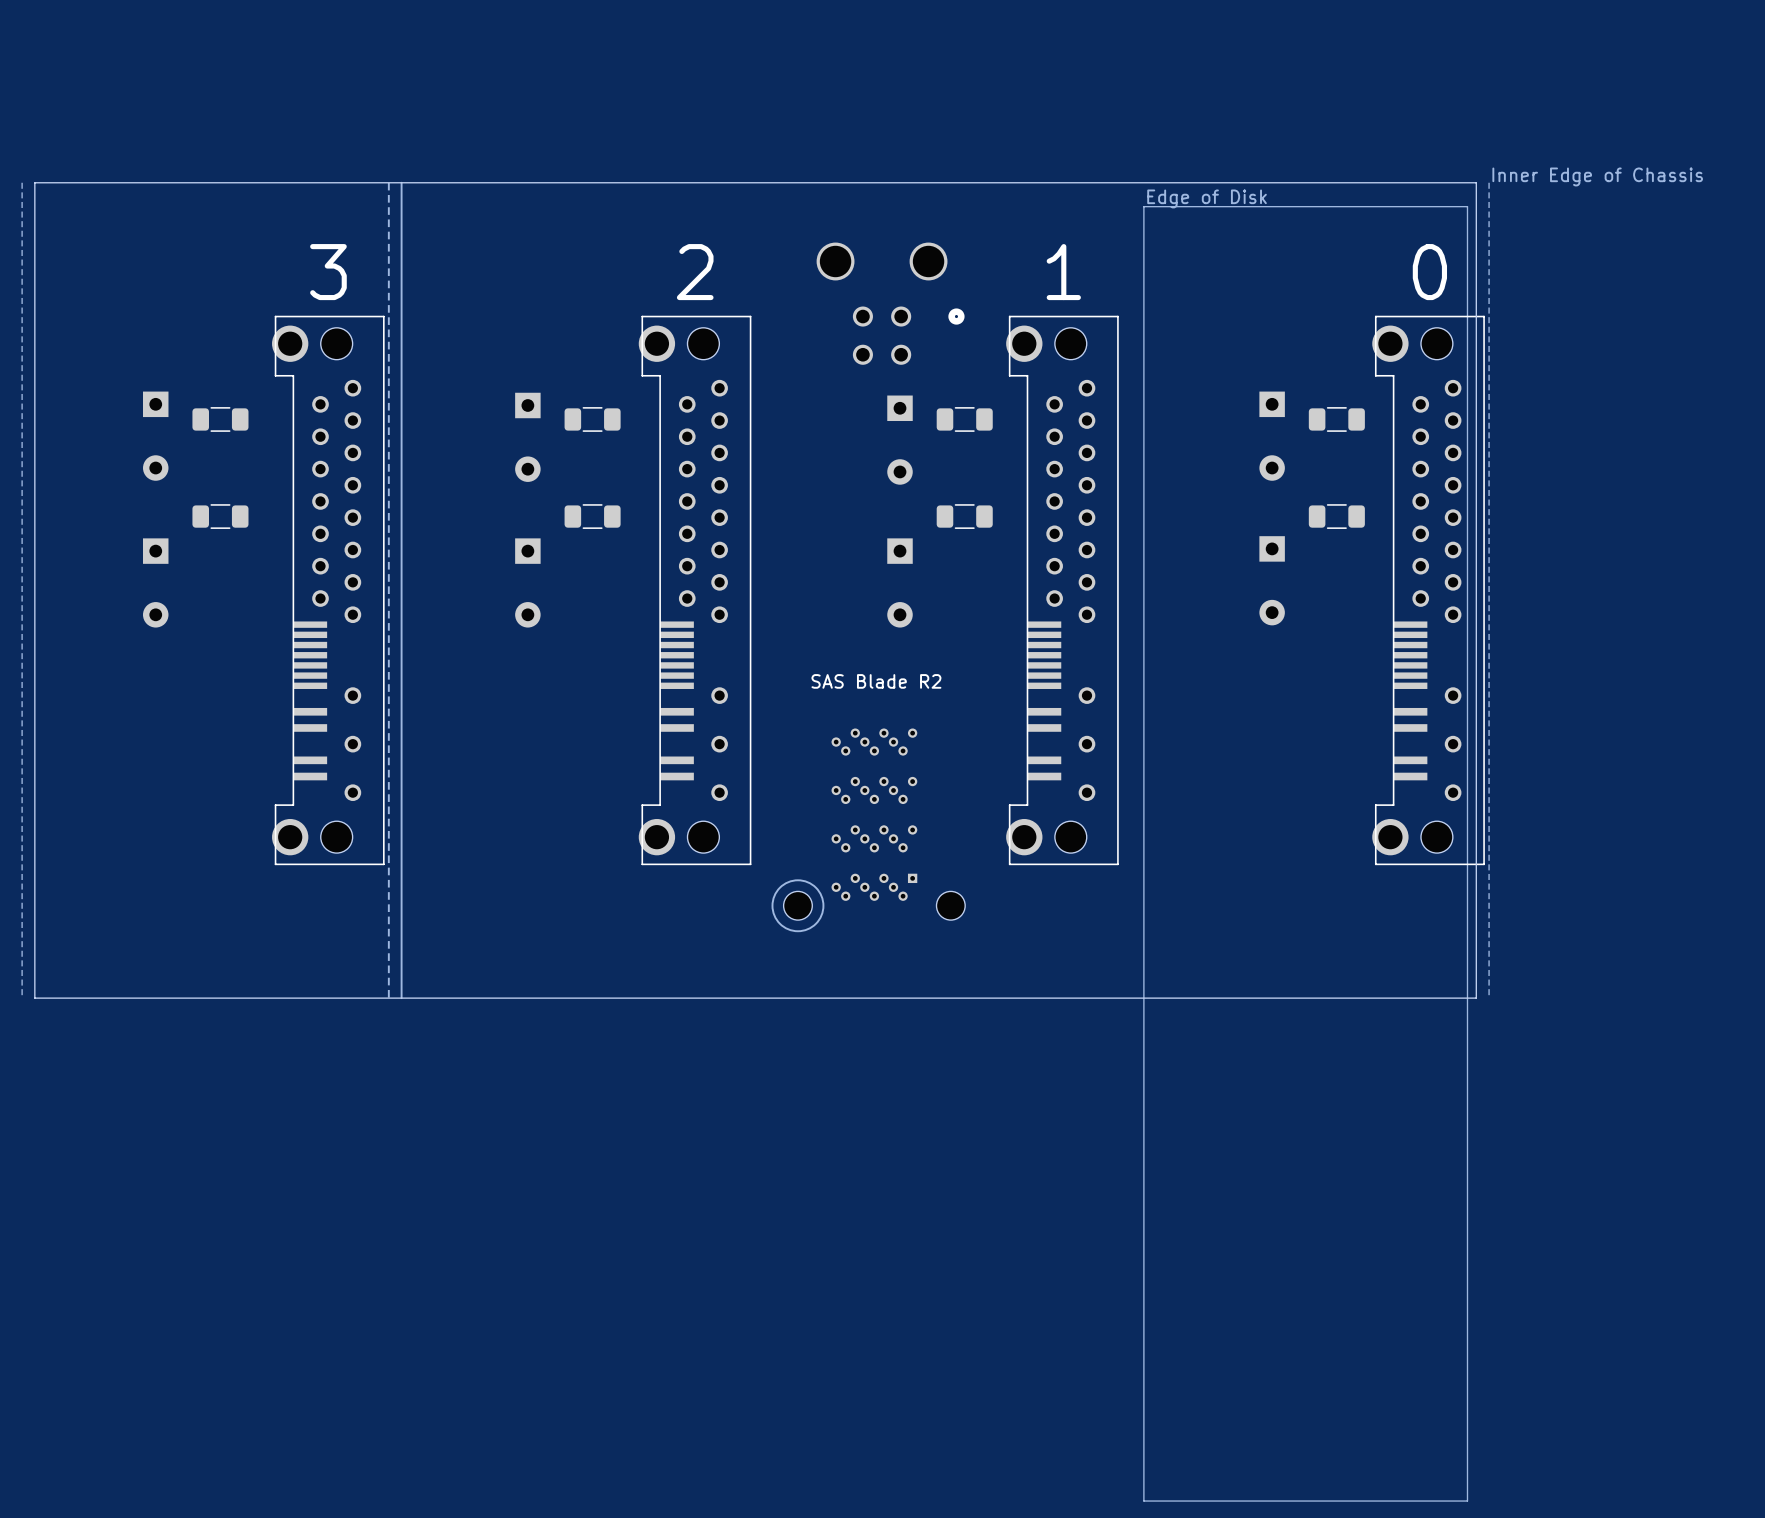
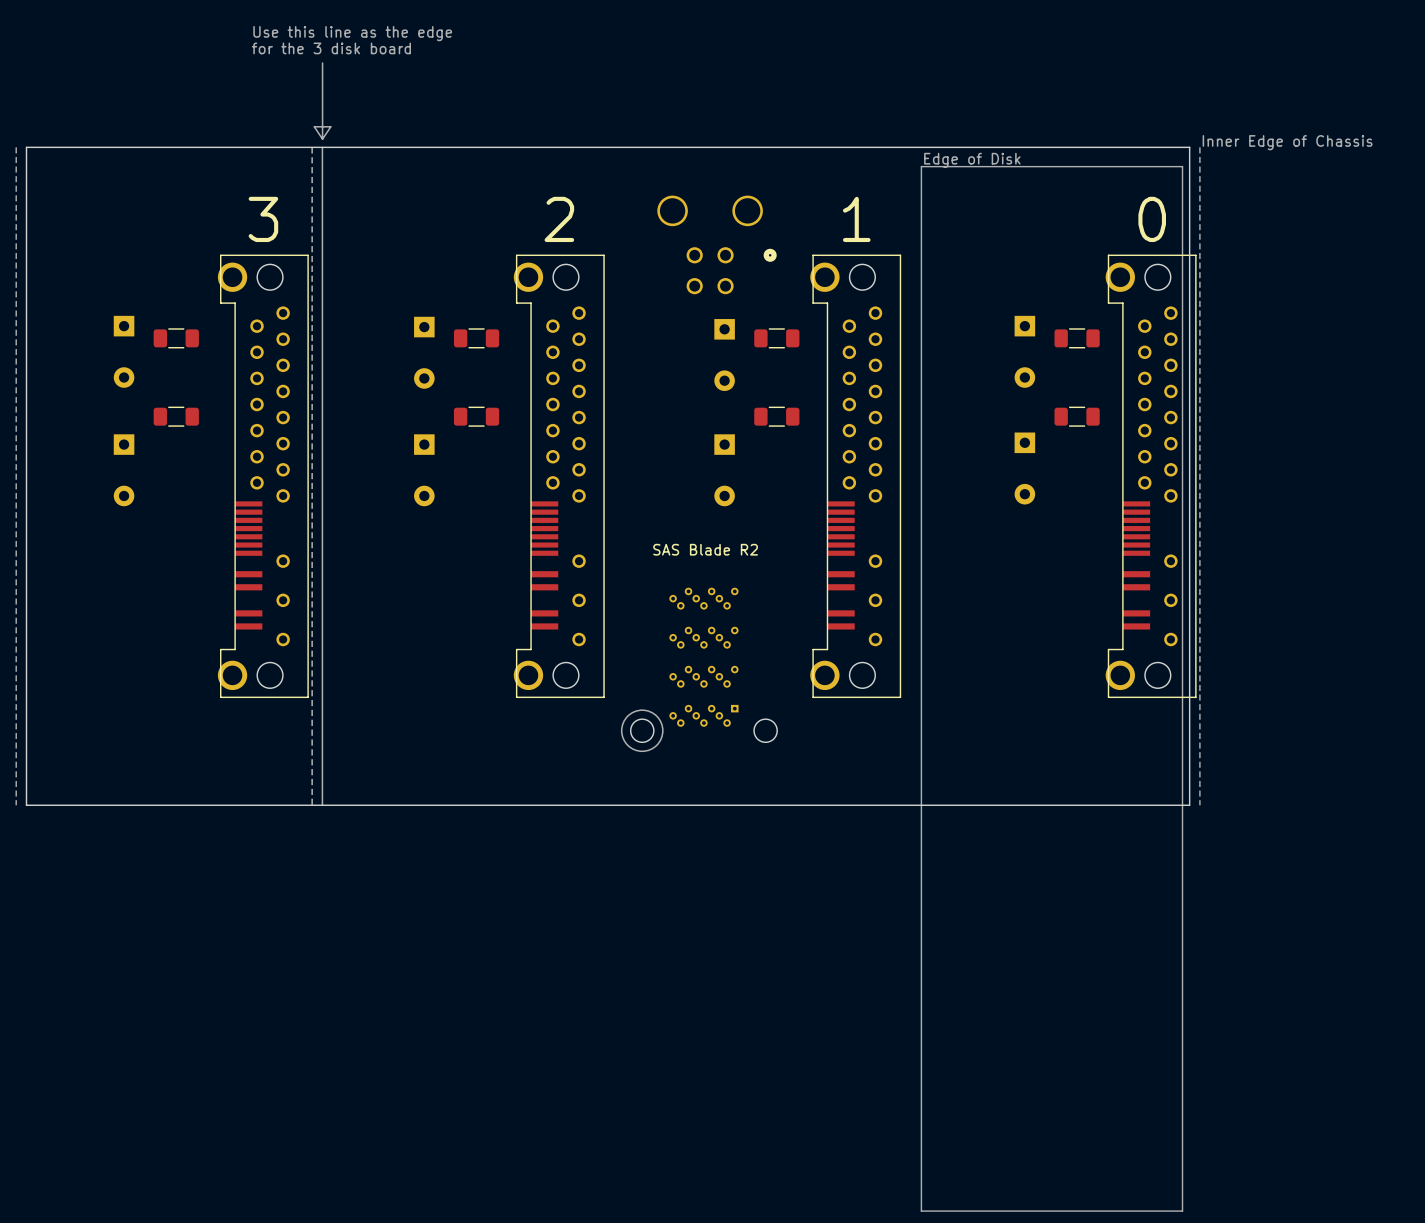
text: none -> Use this line as the edge (352, 33)
text: none -> for the 3 disk board (331, 48)
line: none -> (322, 63) (322, 139)
line: none -> (322, 139) (314, 126) (330, 126) (322, 139)

